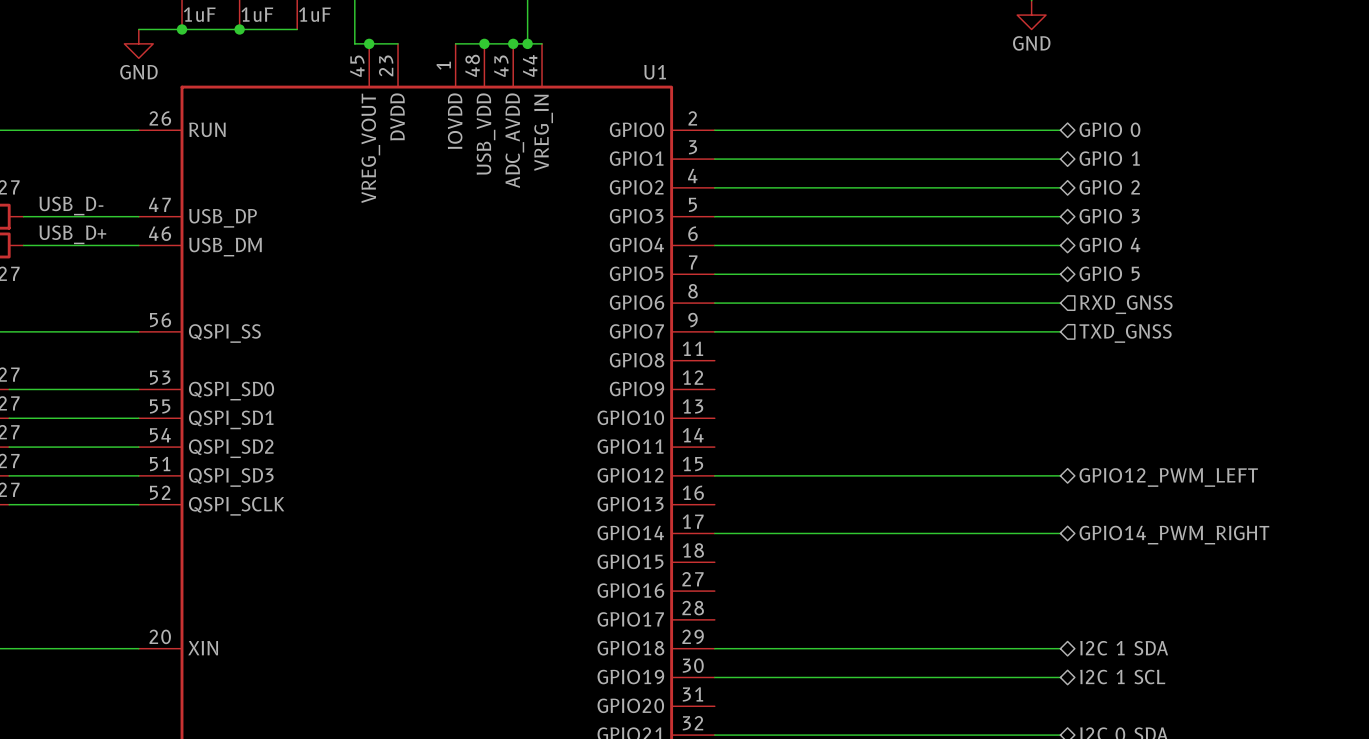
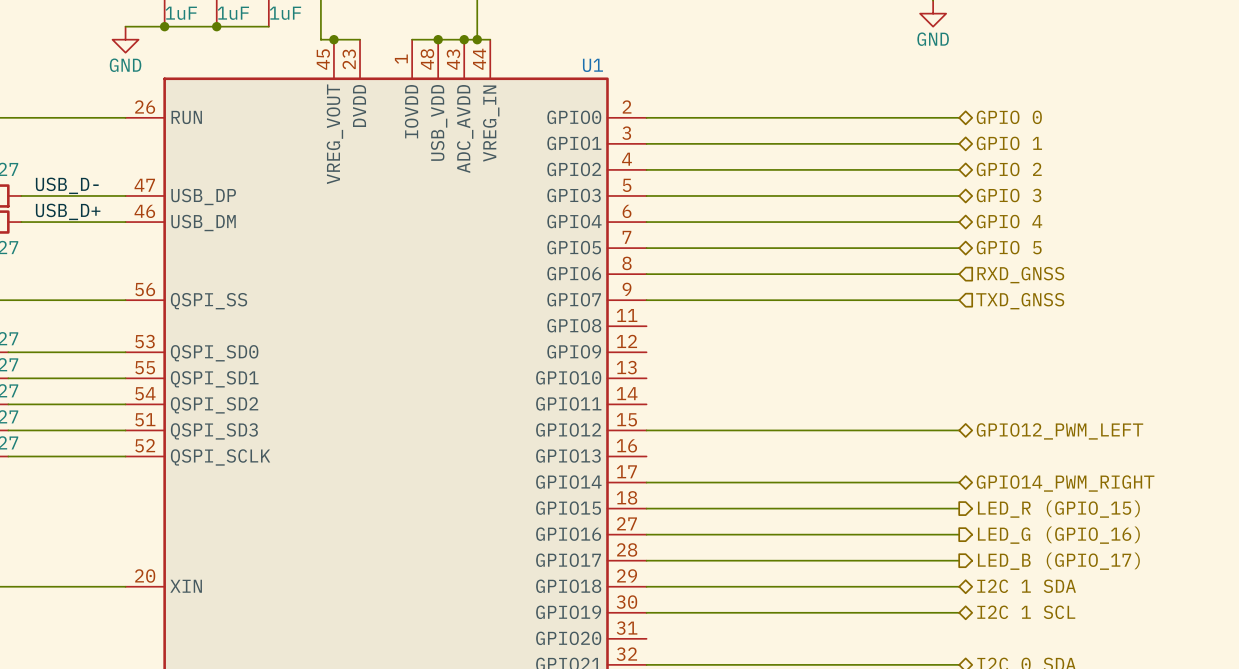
wire: none -> (646, 508) (959, 508)
hierarchical label: none -> LED_R (GPIO_15) (1058, 509)
wire: none -> (646, 534) (959, 534)
hierarchical label: none -> LED_G (GPIO_16) (1058, 535)
wire: none -> (646, 560) (959, 560)
hierarchical label: none -> LED_B (GPIO_17) (1058, 561)

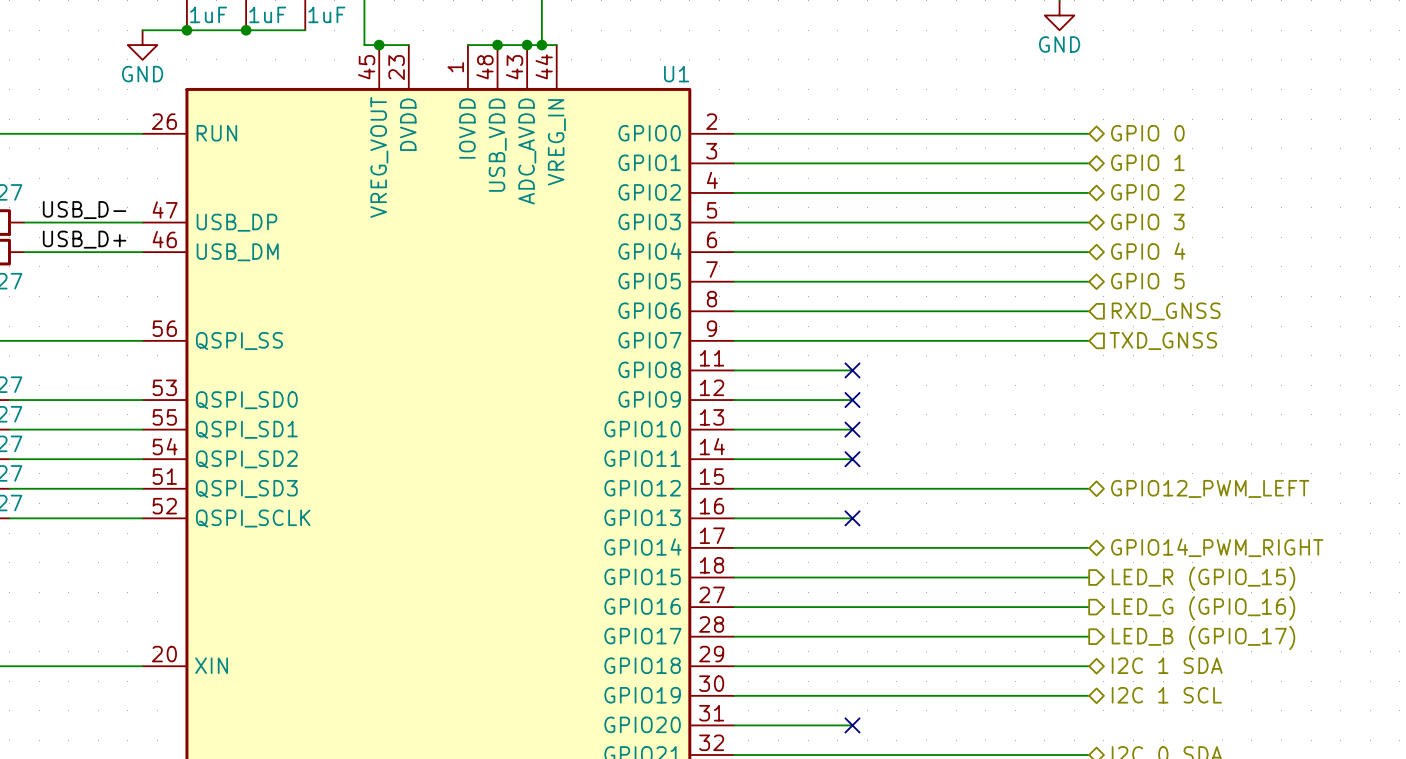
wire: none -> (734, 370) (852, 370)
no-connect mark: none -> (852, 370)
wire: none -> (734, 400) (852, 400)
no-connect mark: none -> (852, 400)
wire: none -> (734, 429) (852, 429)
no-connect mark: none -> (852, 429)
wire: none -> (734, 459) (852, 459)
no-connect mark: none -> (852, 459)
wire: none -> (734, 518) (852, 518)
no-connect mark: none -> (852, 518)
wire: none -> (734, 725) (852, 725)
no-connect mark: none -> (852, 725)

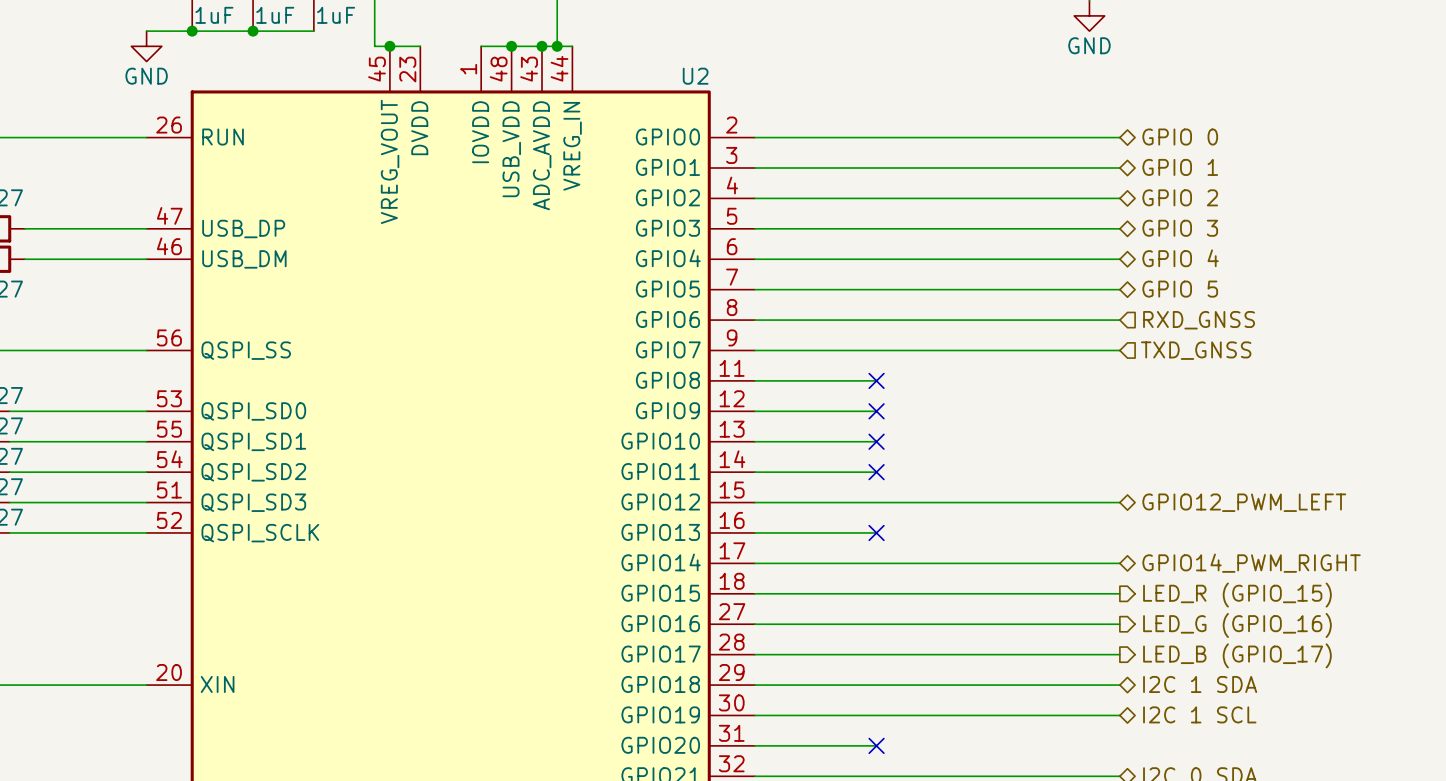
U1 name: U1 (676, 74) -> U2 (695, 76)
label: USB_D- (84, 210) -> none
label: USB_D+ (84, 239) -> none

